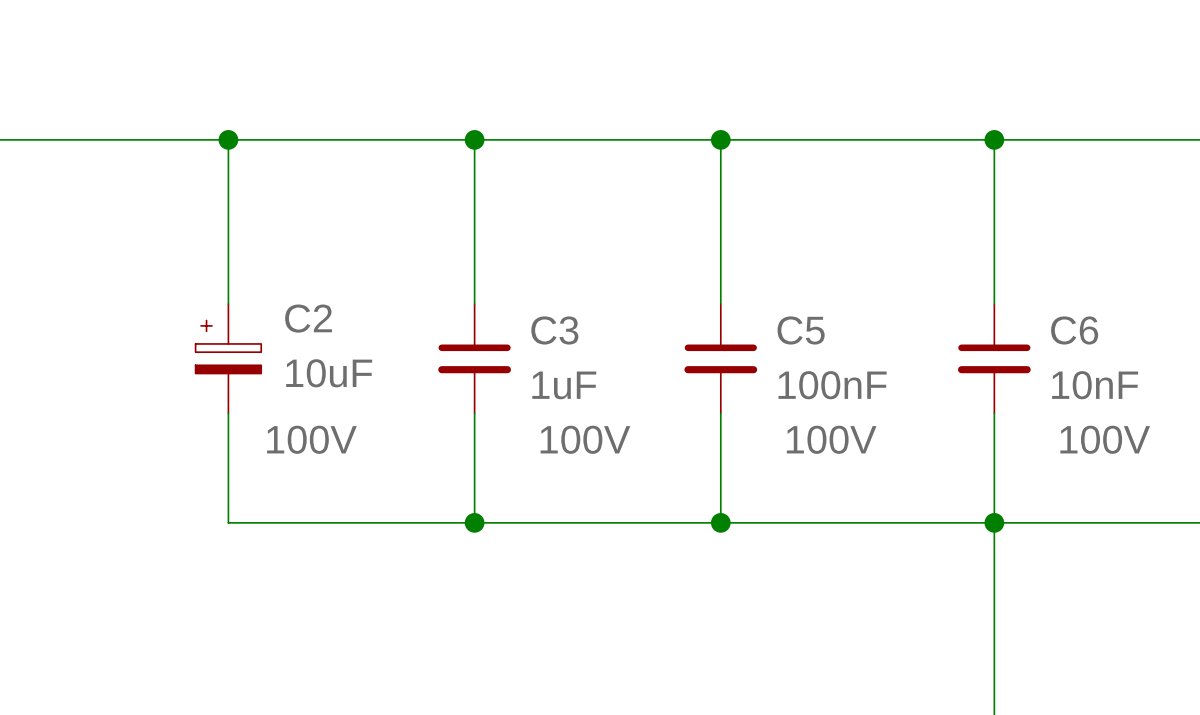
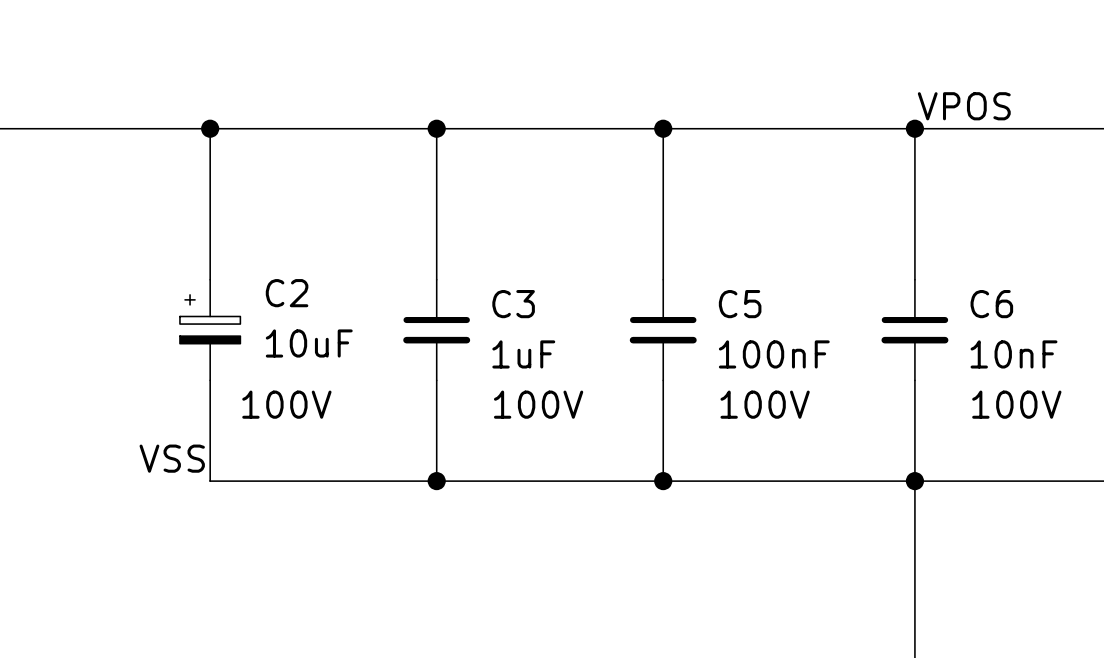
label: none -> VPOS (964, 106)
label: none -> VSS (172, 458)

